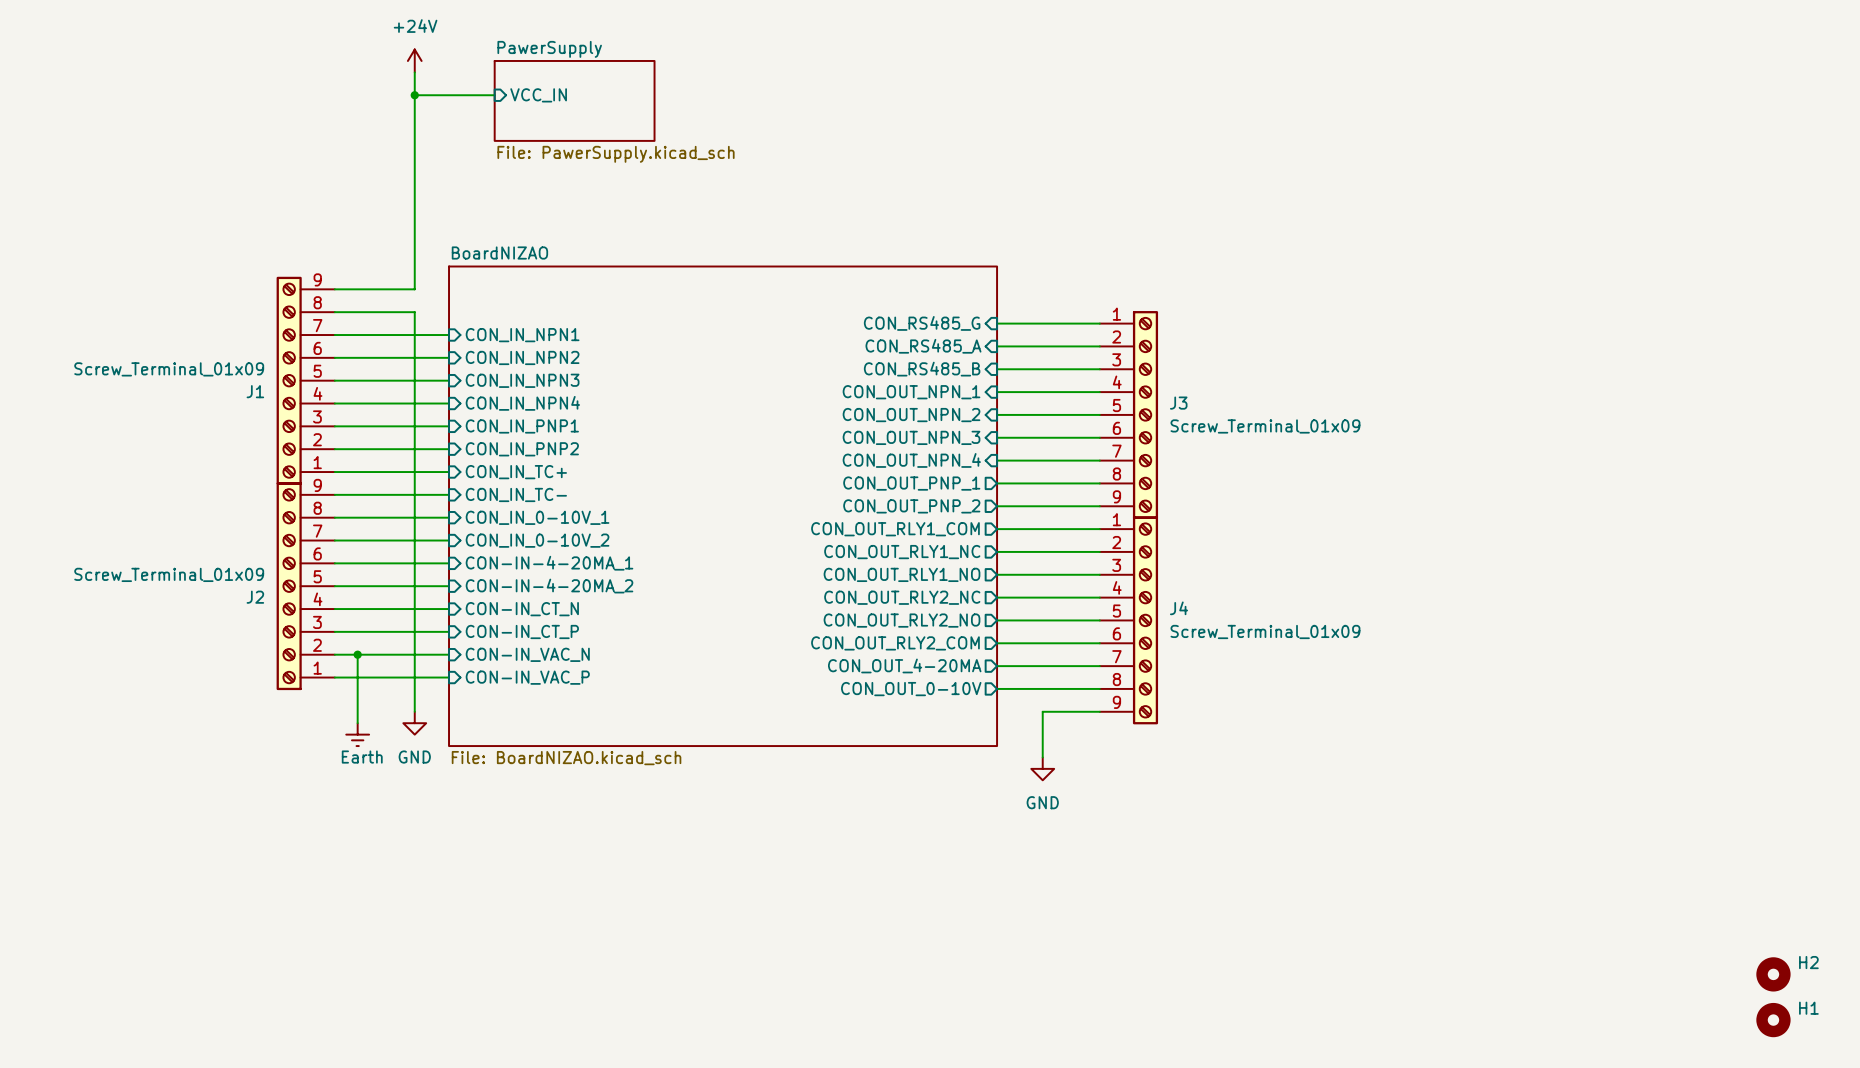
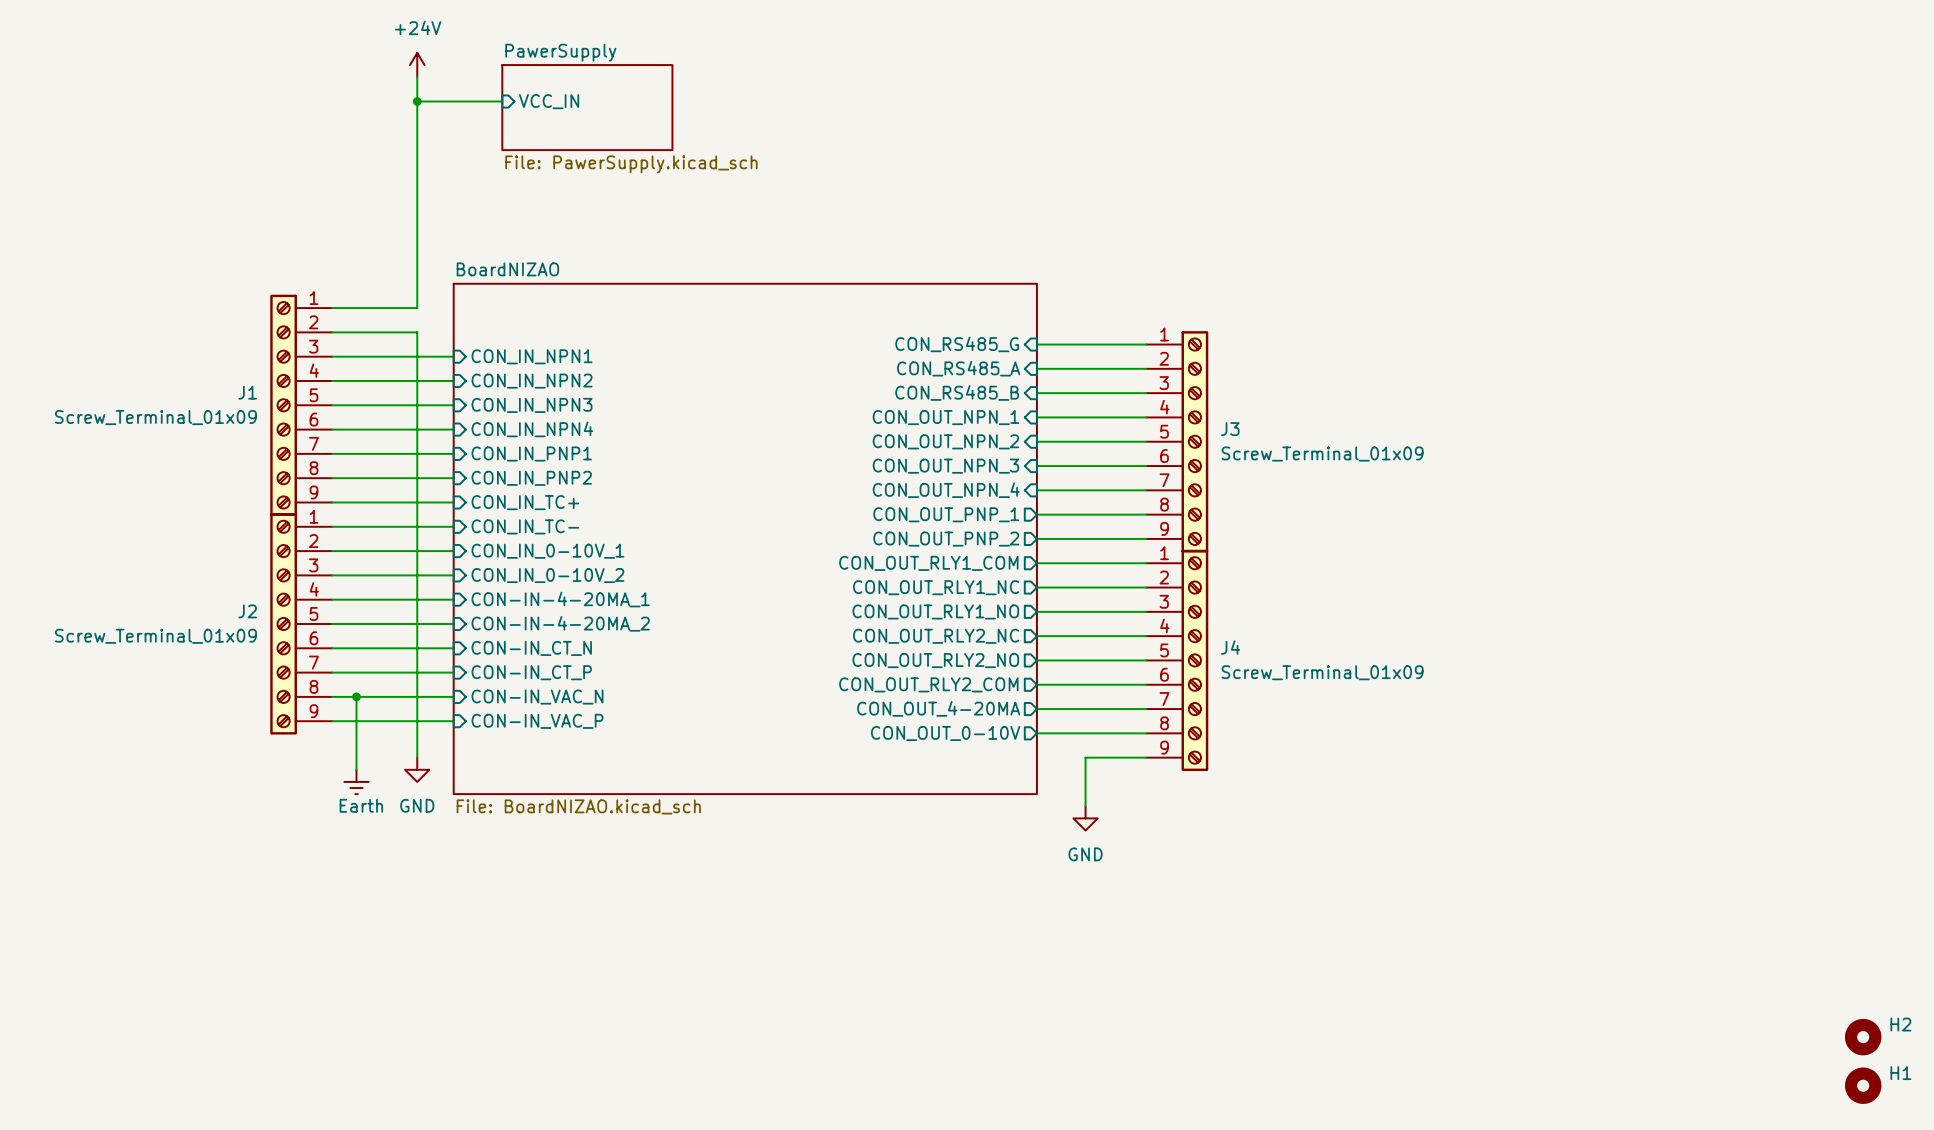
J1 flip: as is (289, 380) -> up-down (283, 405)
J2 flip: as is (289, 586) -> up-down (283, 623)

